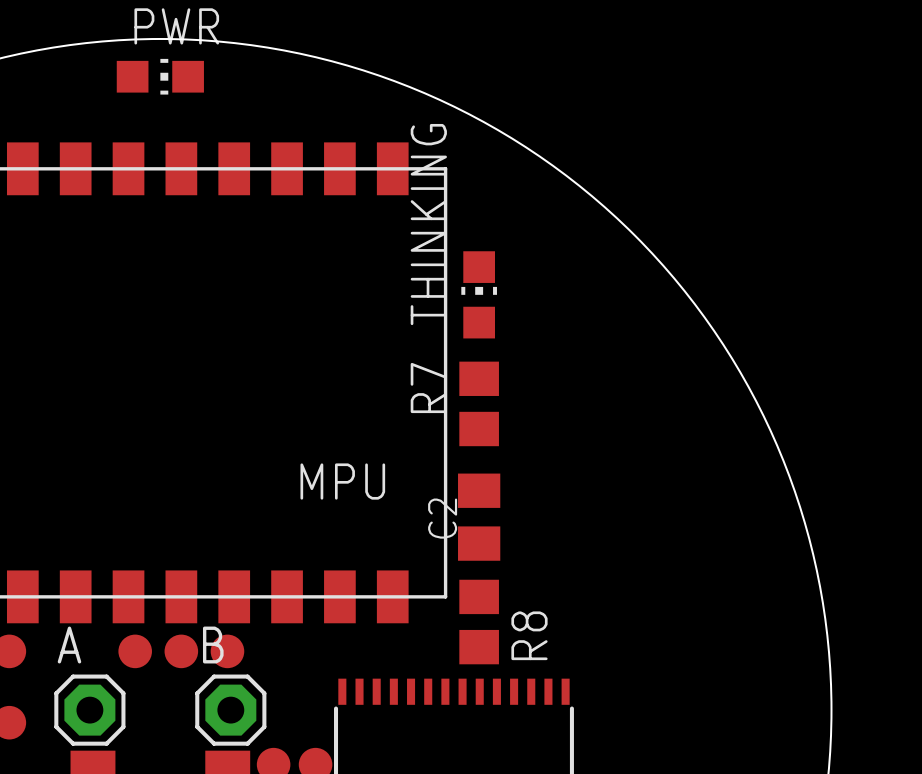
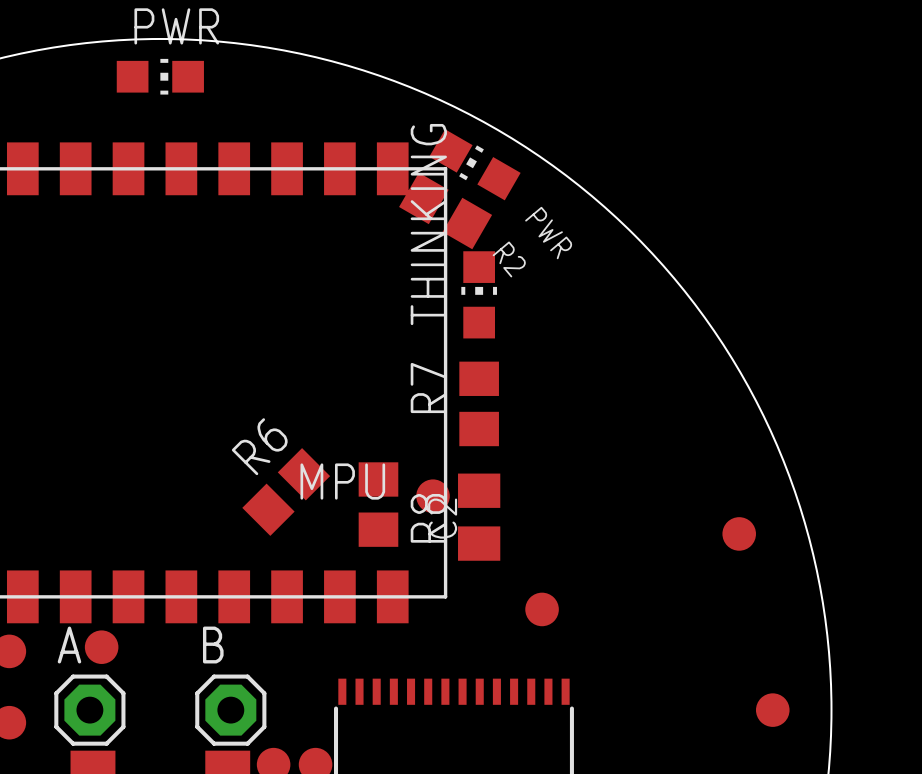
PWR: none -> (474, 164)
R2: none -> (445, 210)
R6: none -> (286, 491)
part: none -> (433, 496)
part: none -> (739, 533)
part: none -> (542, 609)
R8 position: (479, 622) -> (378, 504)
part position: (135, 651) -> (101, 647)
part: (181, 651) -> none
part: (227, 651) -> none
part: none -> (772, 710)

